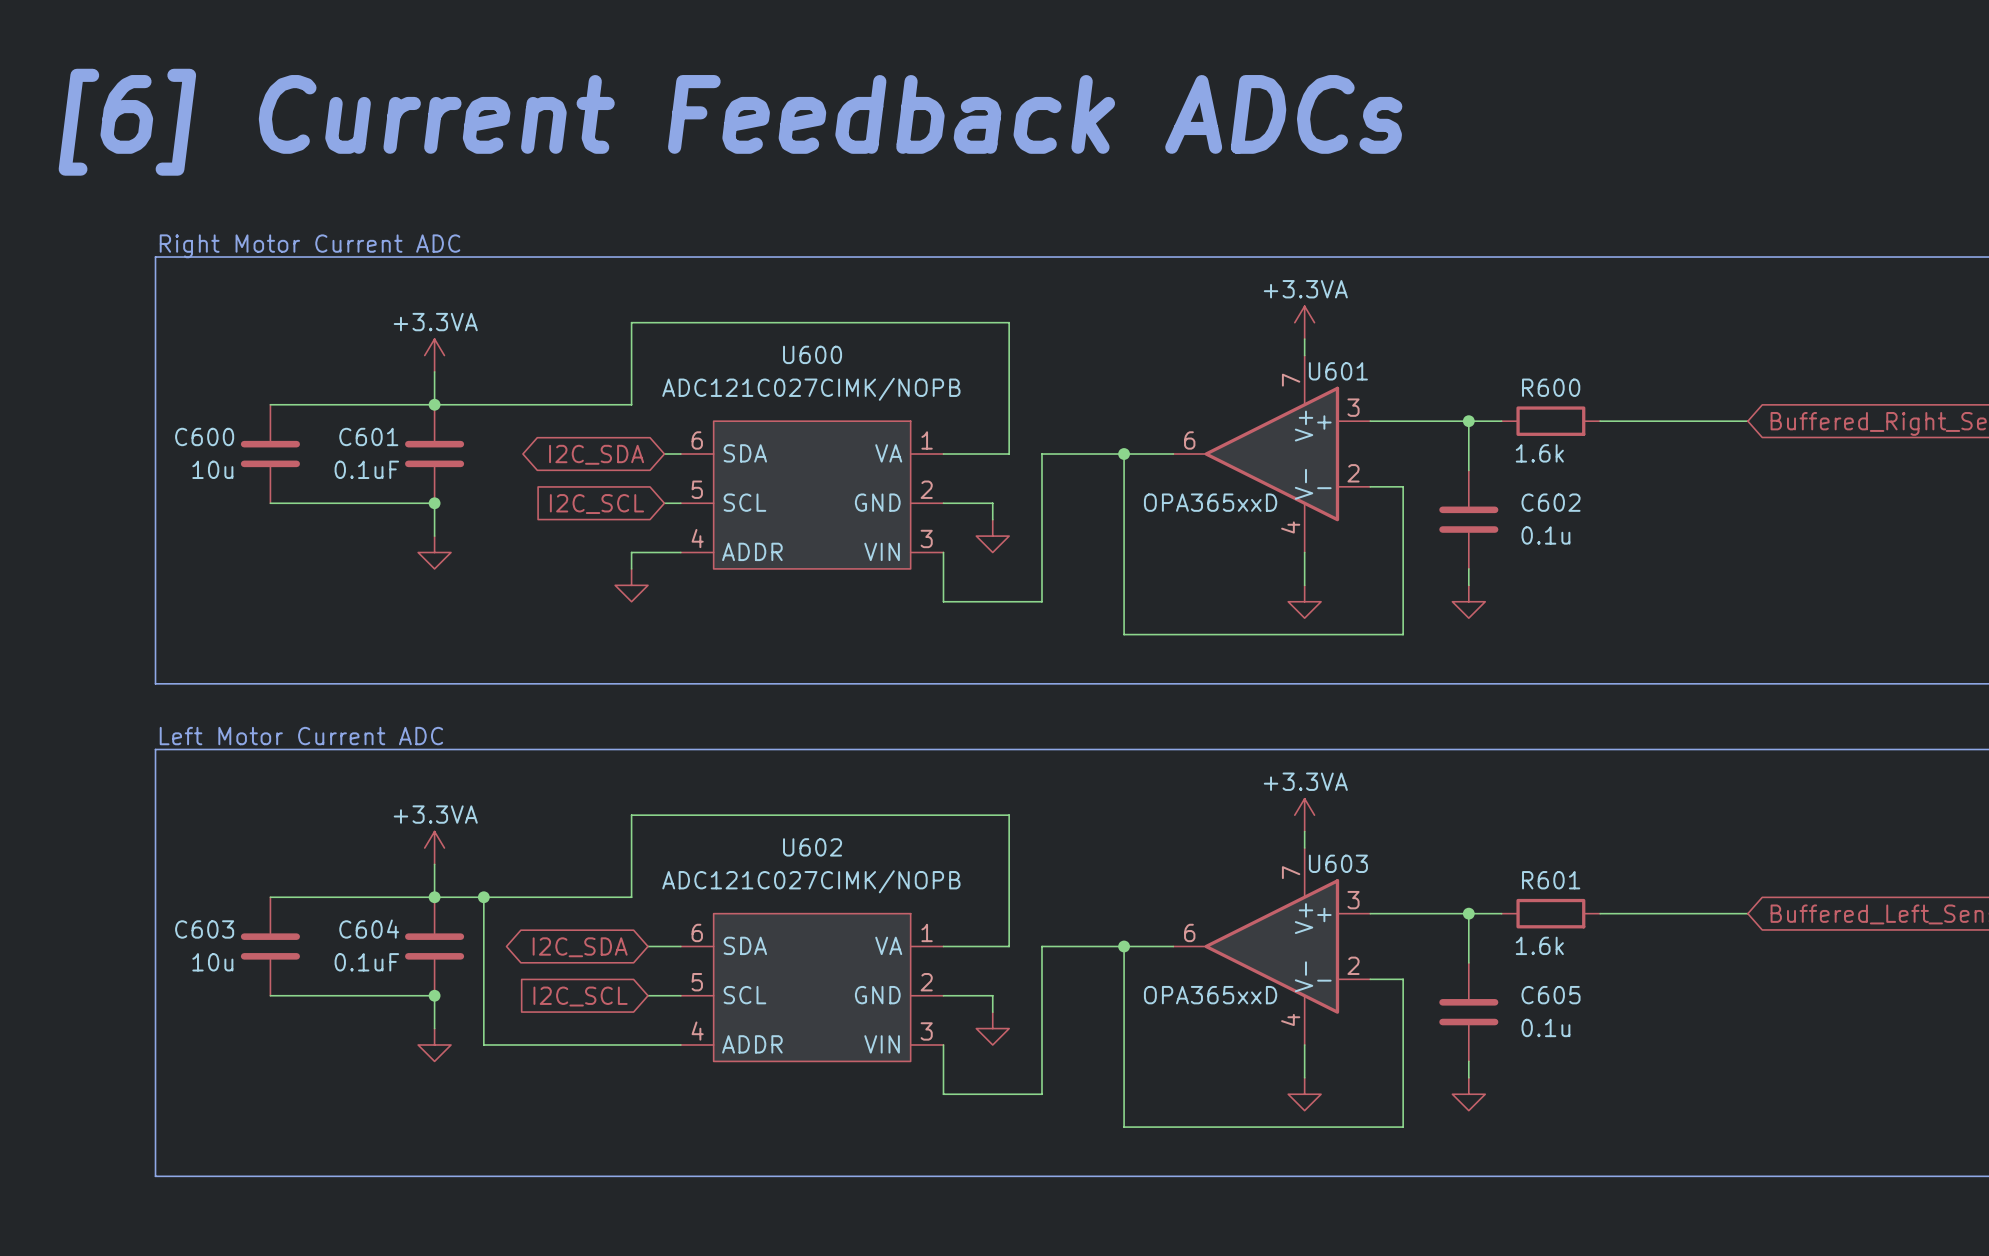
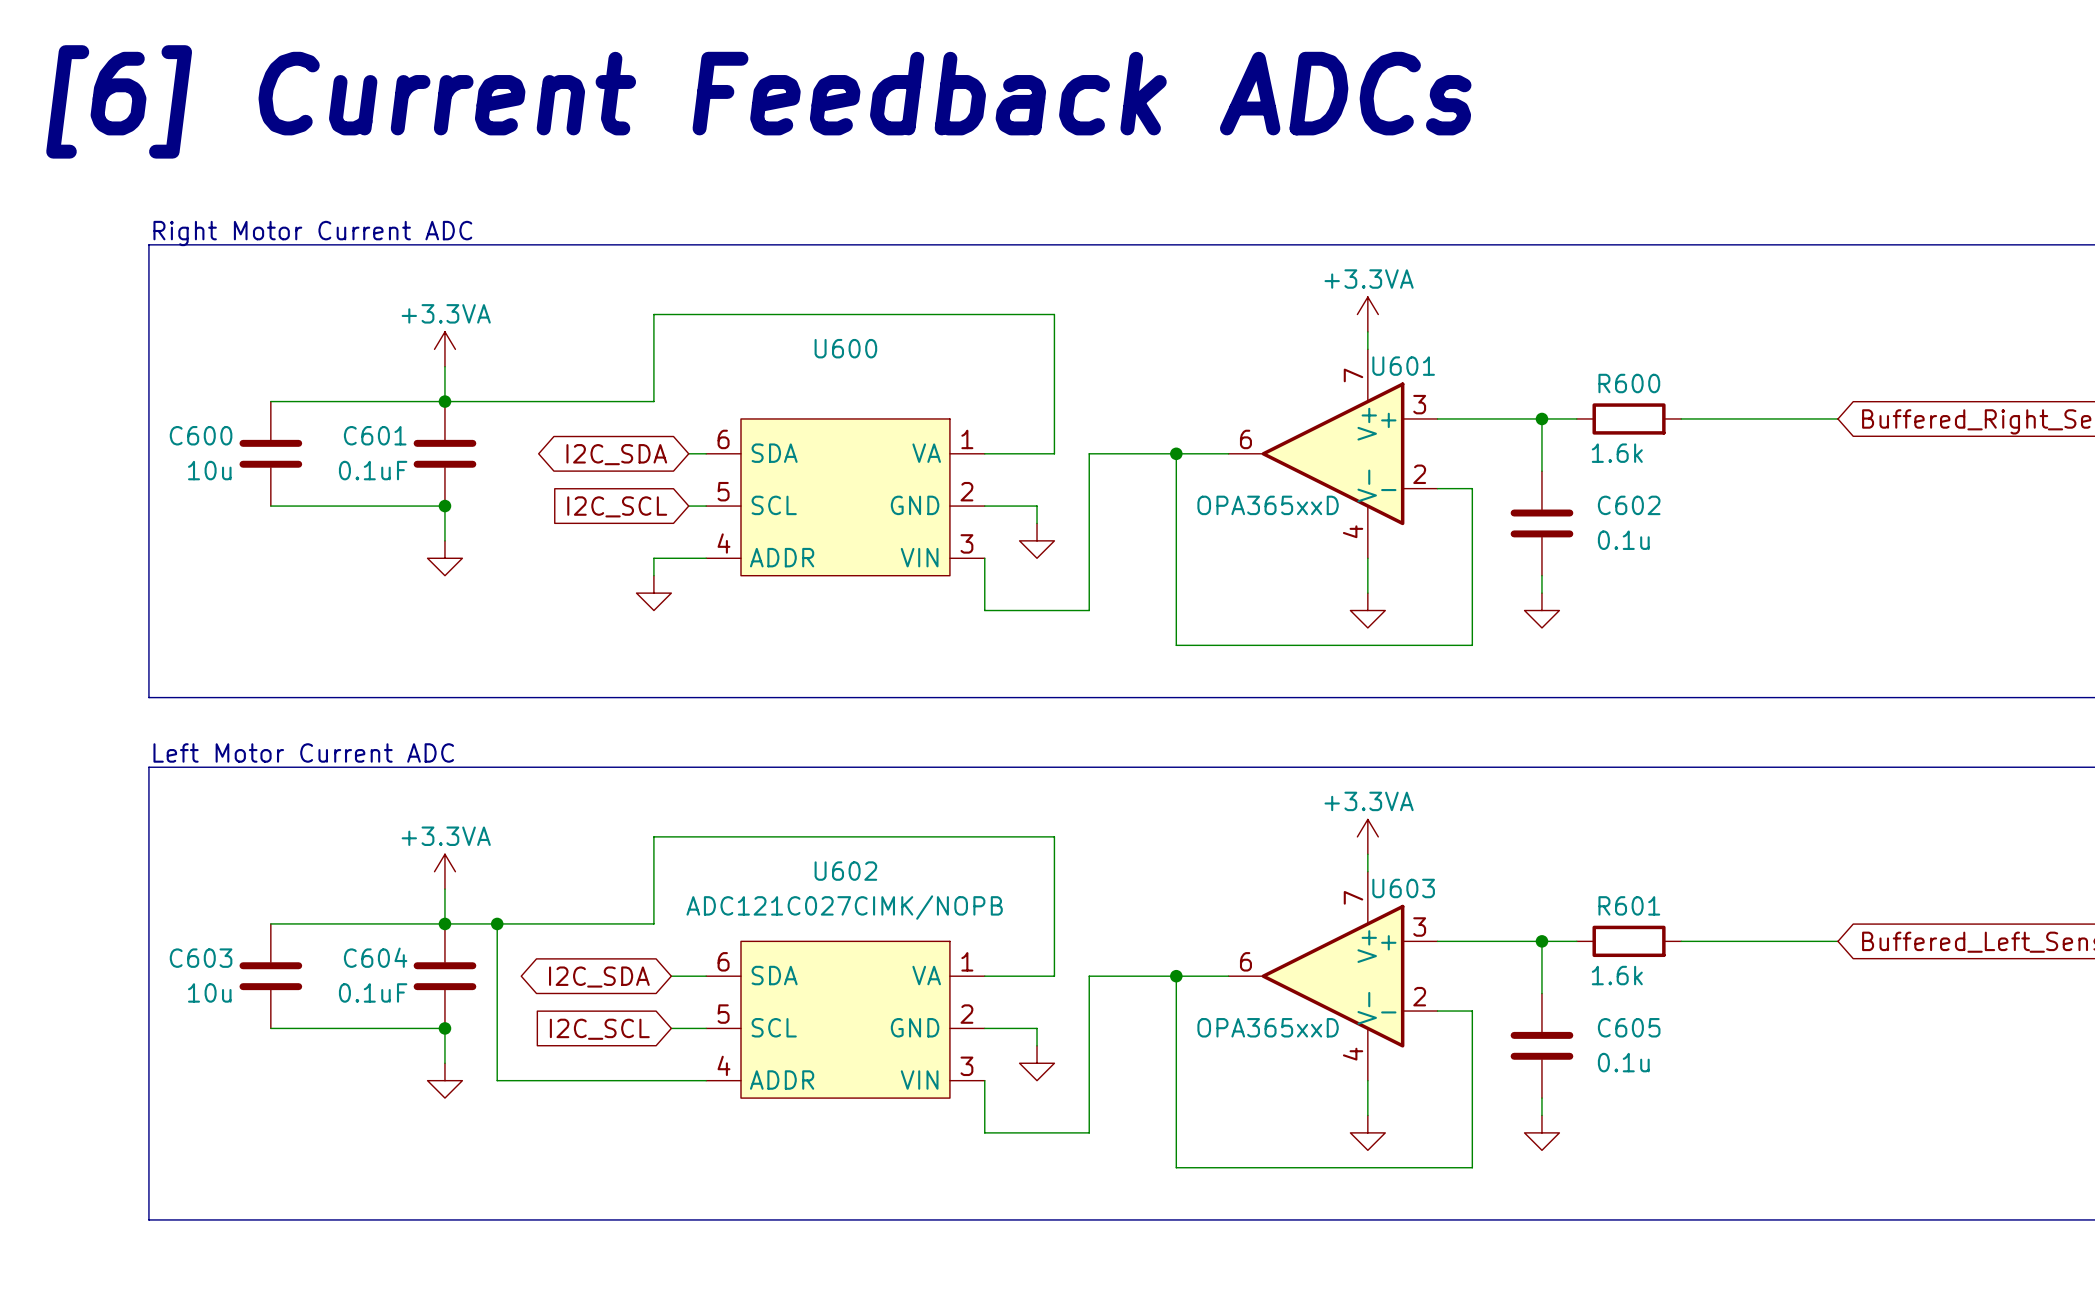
U600 value: ADC121C027CIMK/NOPB (811, 389) -> none

